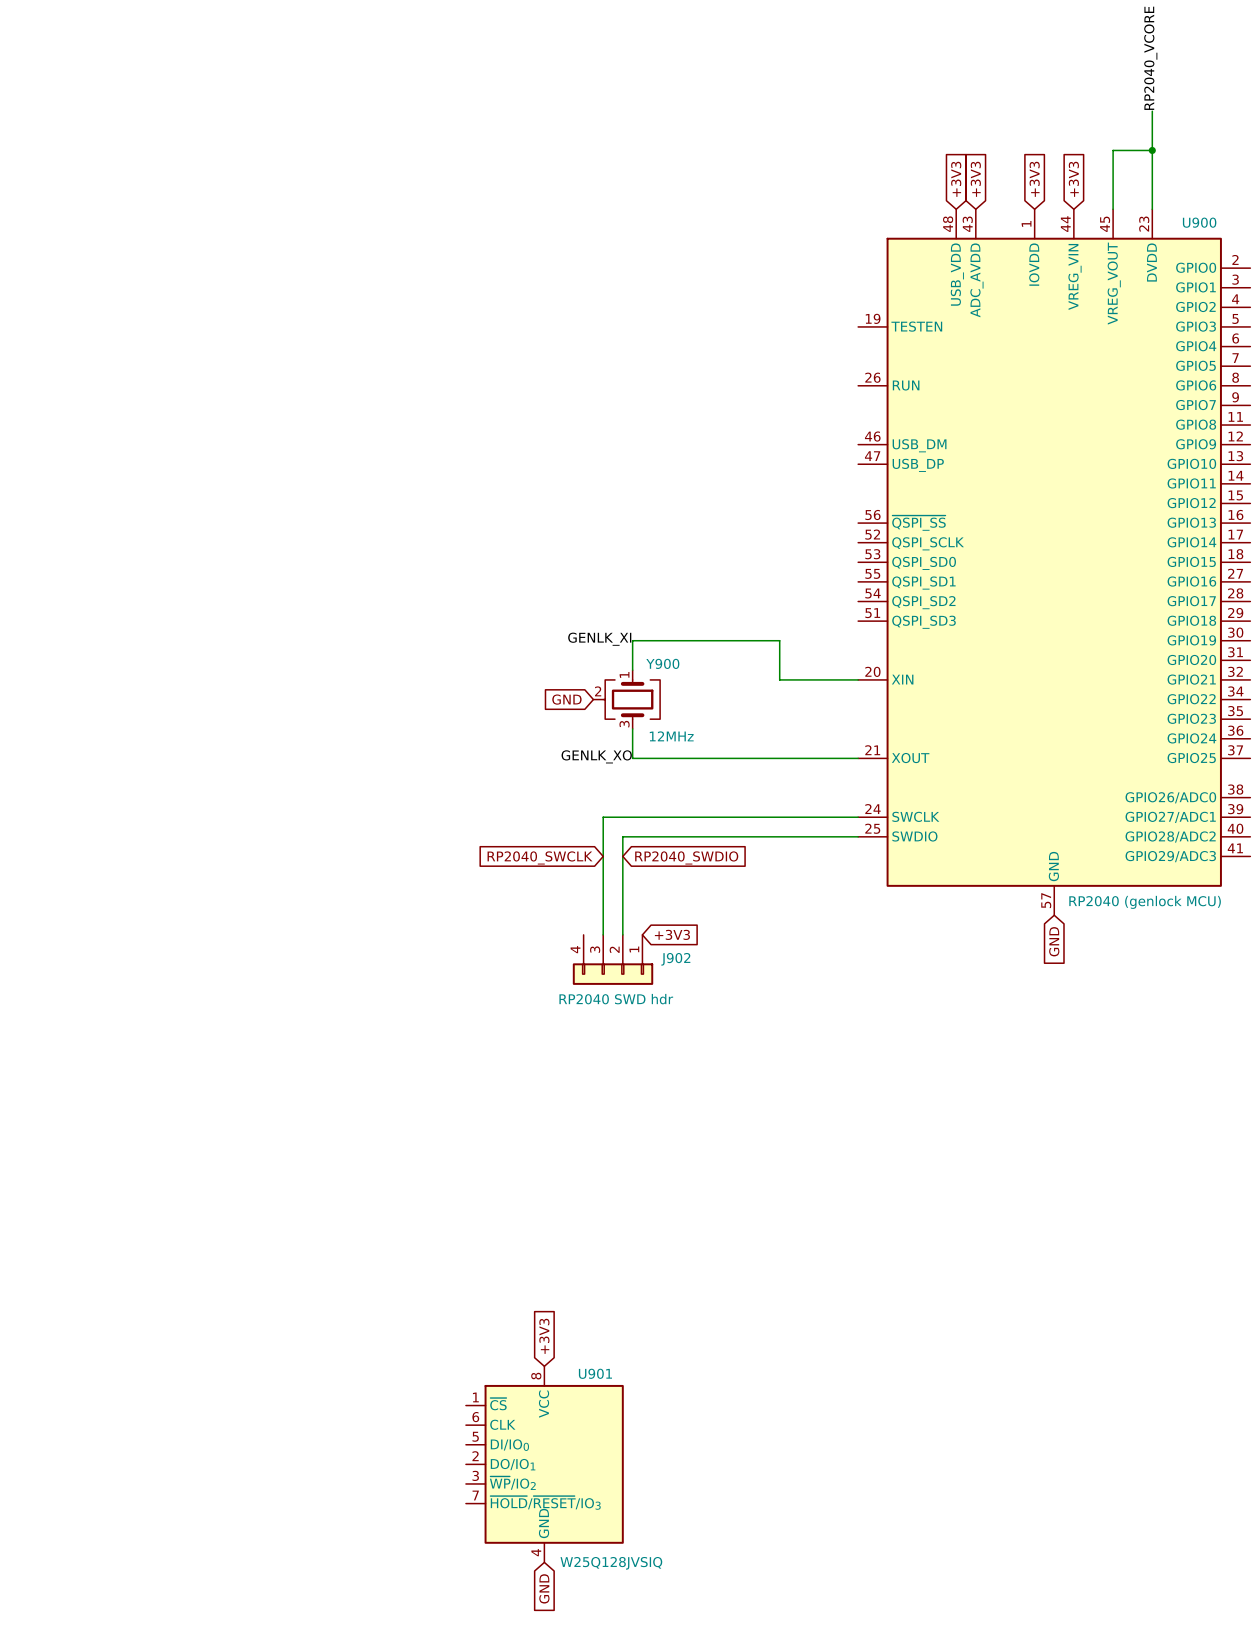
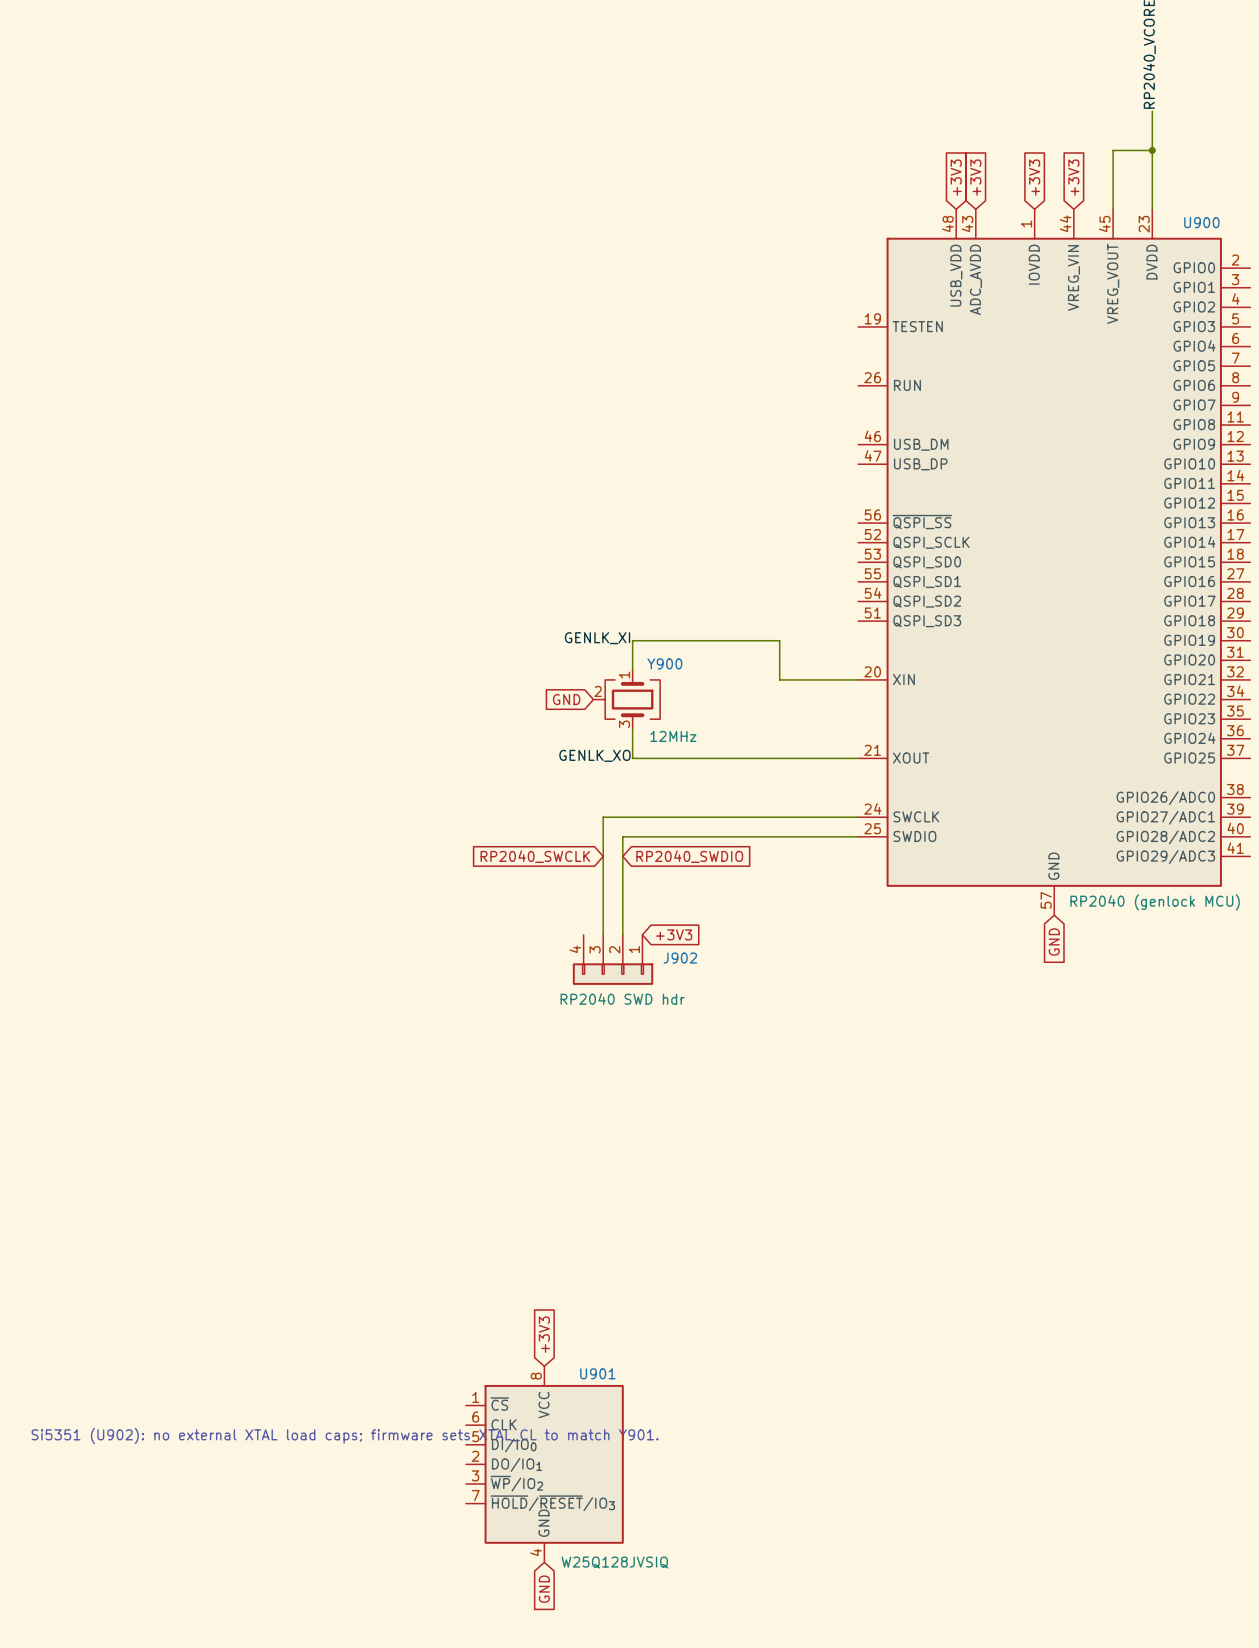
text: none -> Si5351 (U902): no external XTAL load caps; firmware sets XTAL_CL to match Y901. (345, 1435)

